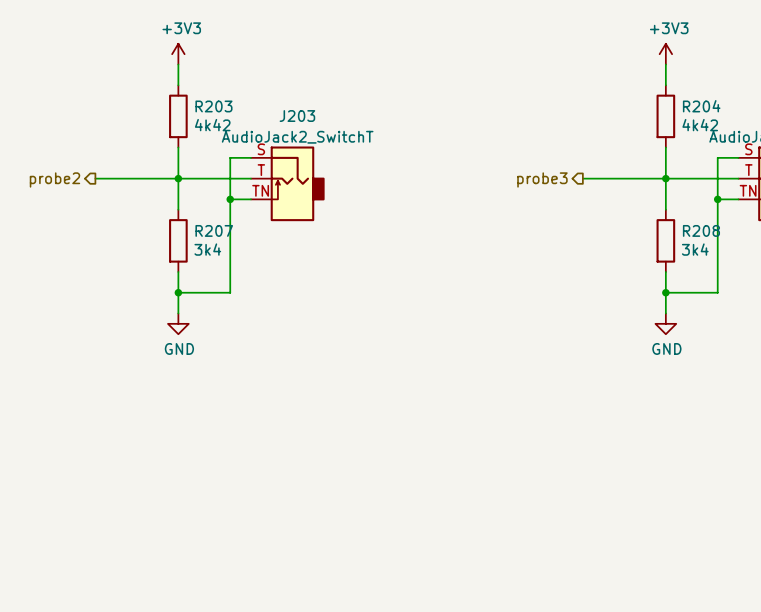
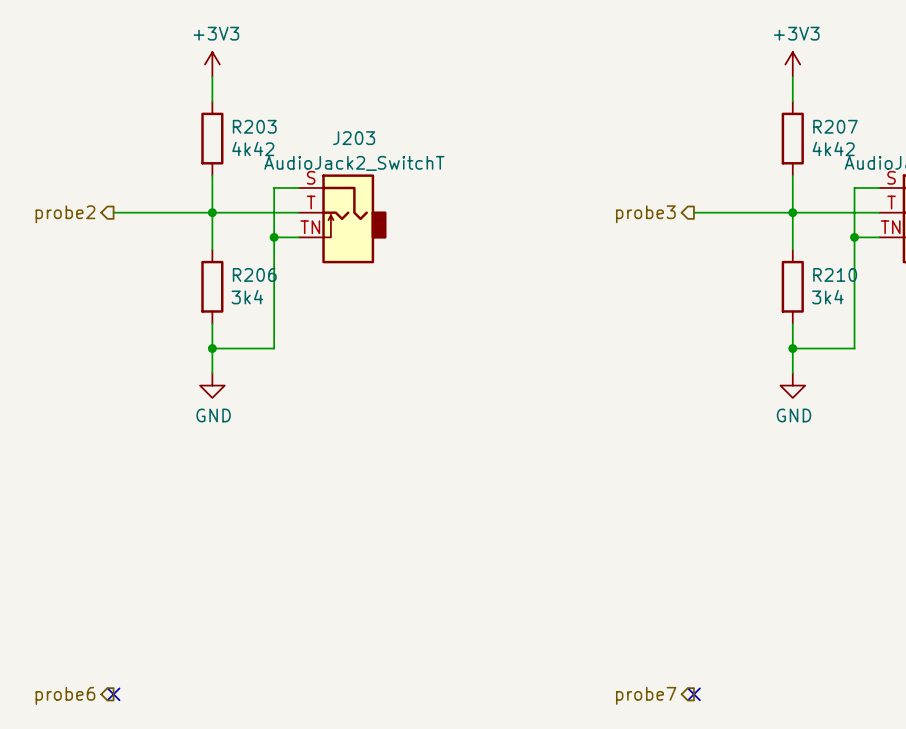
R204 name: R204 (701, 106) -> R207 (835, 126)
R207 name: R207 (214, 230) -> R206 (254, 274)
R208 name: R208 (701, 230) -> R210 (835, 274)
no-connect mark: none -> (113, 694)
no-connect mark: none -> (693, 694)
hierarchical label: none -> probe6 (65, 695)
hierarchical label: none -> probe7 (646, 695)

